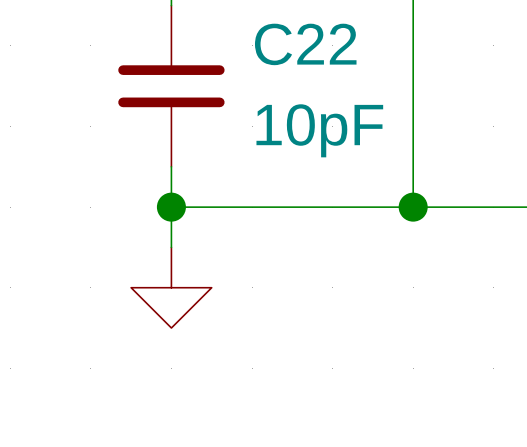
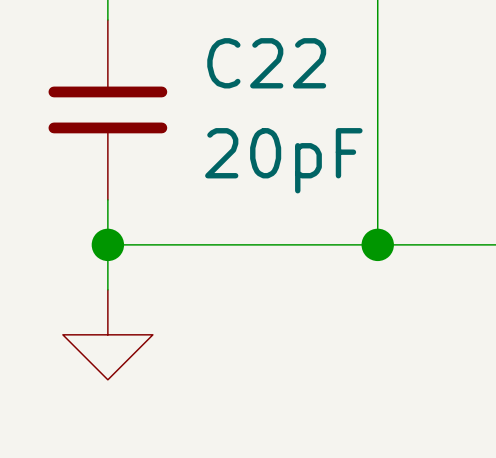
C22 value: 10pF (319, 130) -> 20pF (283, 160)

